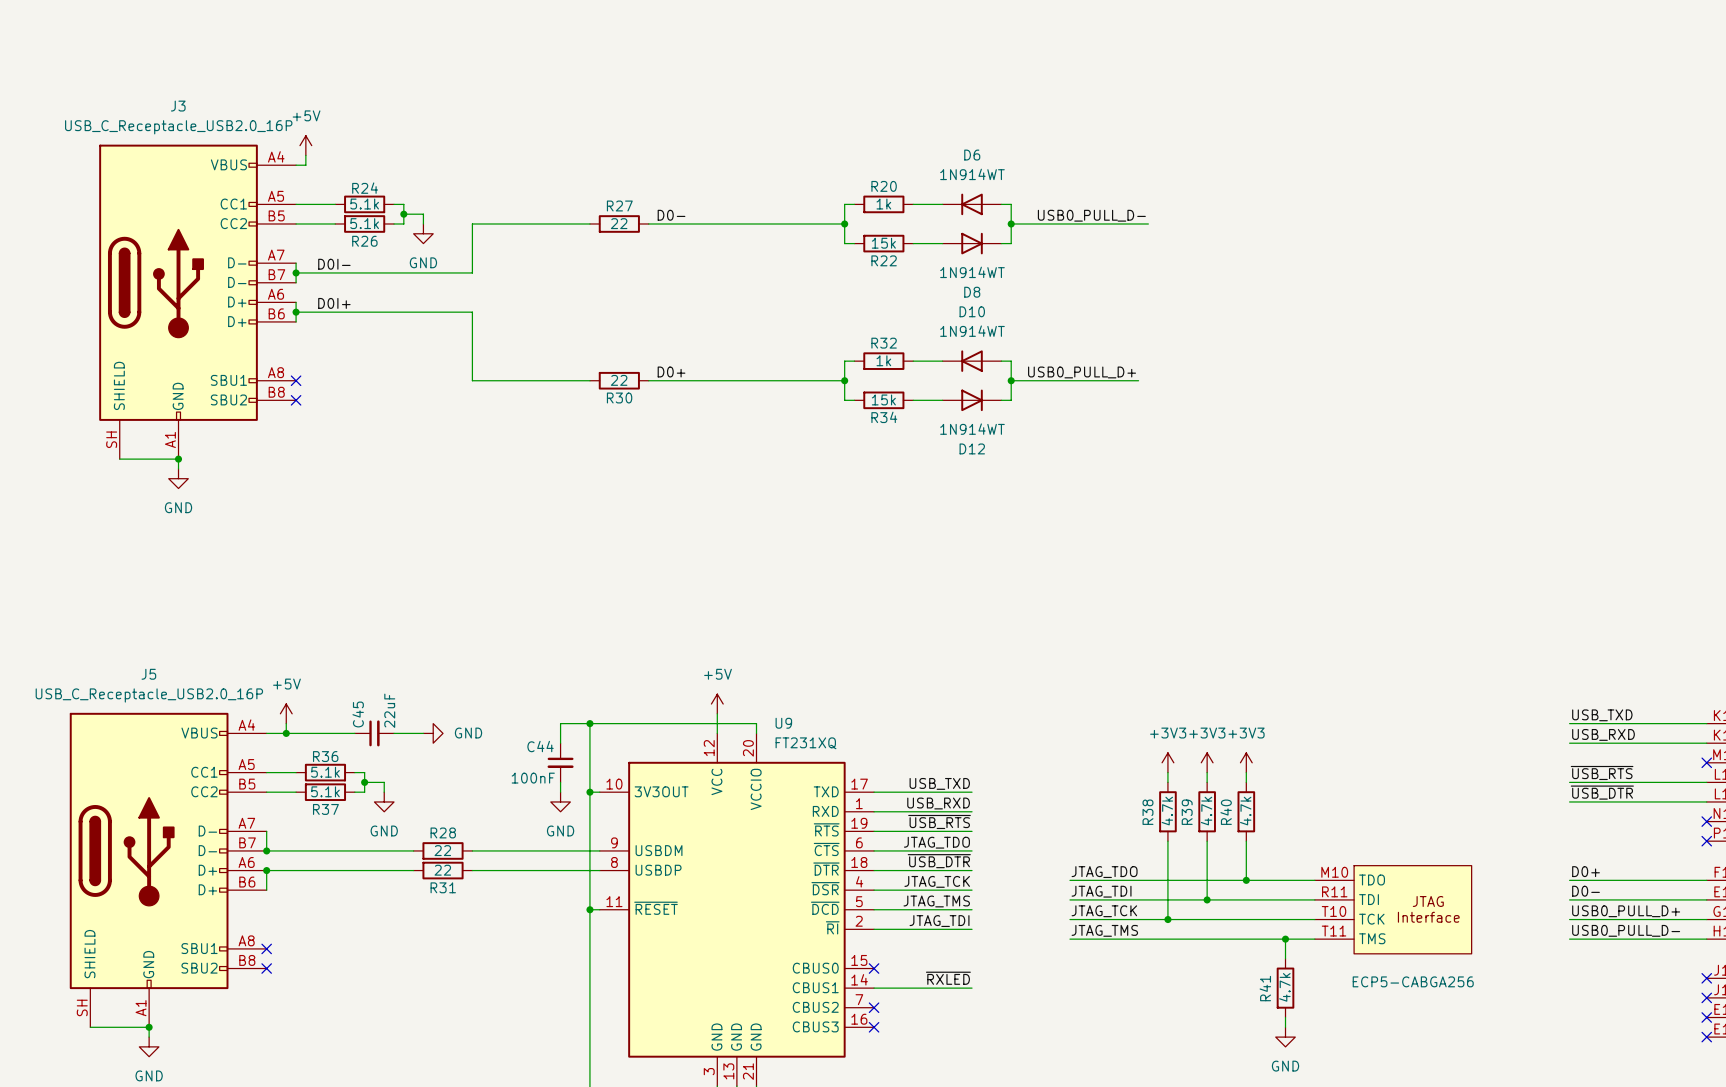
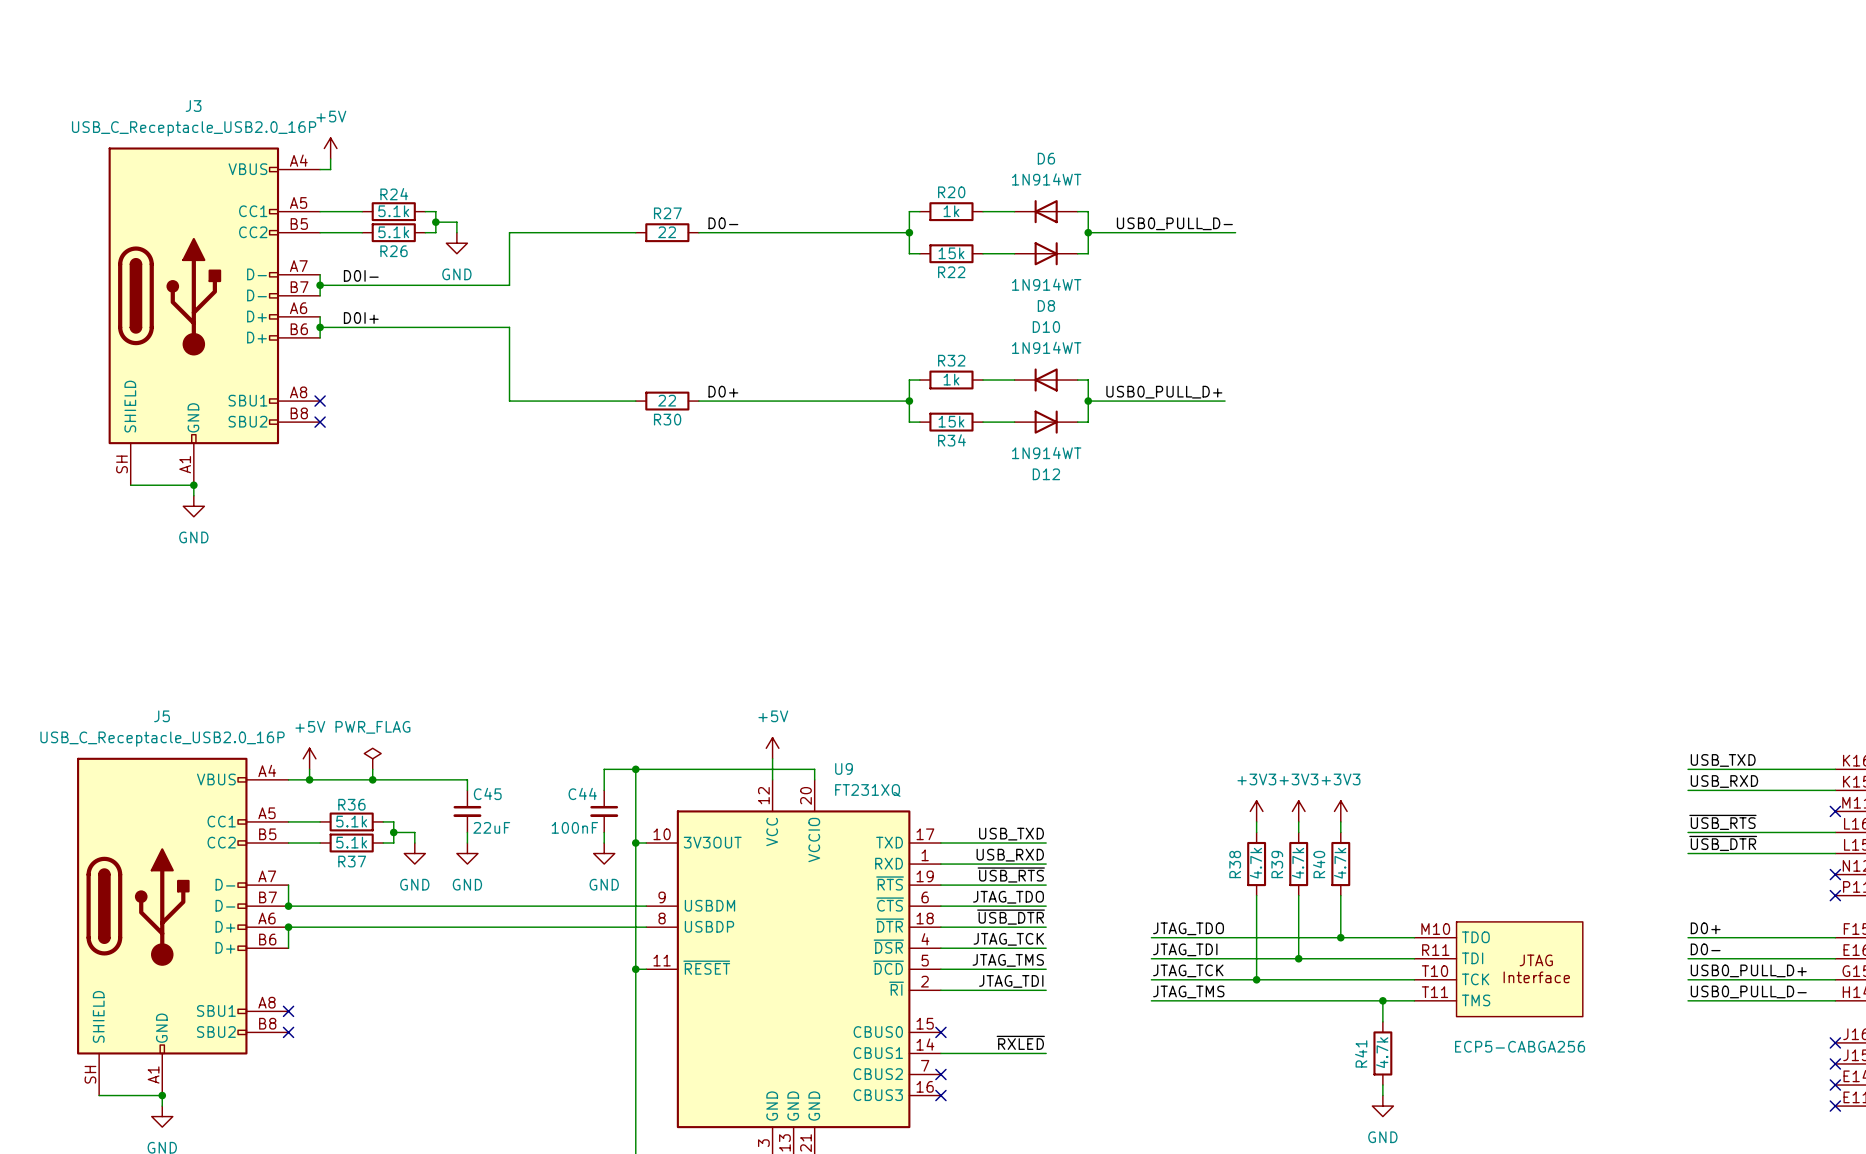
power symbol: none -> PWR_FLAG (372, 758)
wire: none -> (372, 769) (372, 779)
junction: none -> (372, 779)
C45 rotation: 0° (374, 733) -> 90° clockwise (467, 811)
C45 position: (374, 733) -> (467, 811)
power symbol rotation: 0° (433, 733) -> 90° clockwise (467, 853)
power symbol position: GND (433, 733) -> GND (467, 853)
wire: none -> (467, 832) (467, 843)
wire: none -> (446, 906) (509, 906)
R28: 22 (443, 850) -> none
wire: none -> (446, 927) (509, 927)
R31: 22 (443, 870) -> none

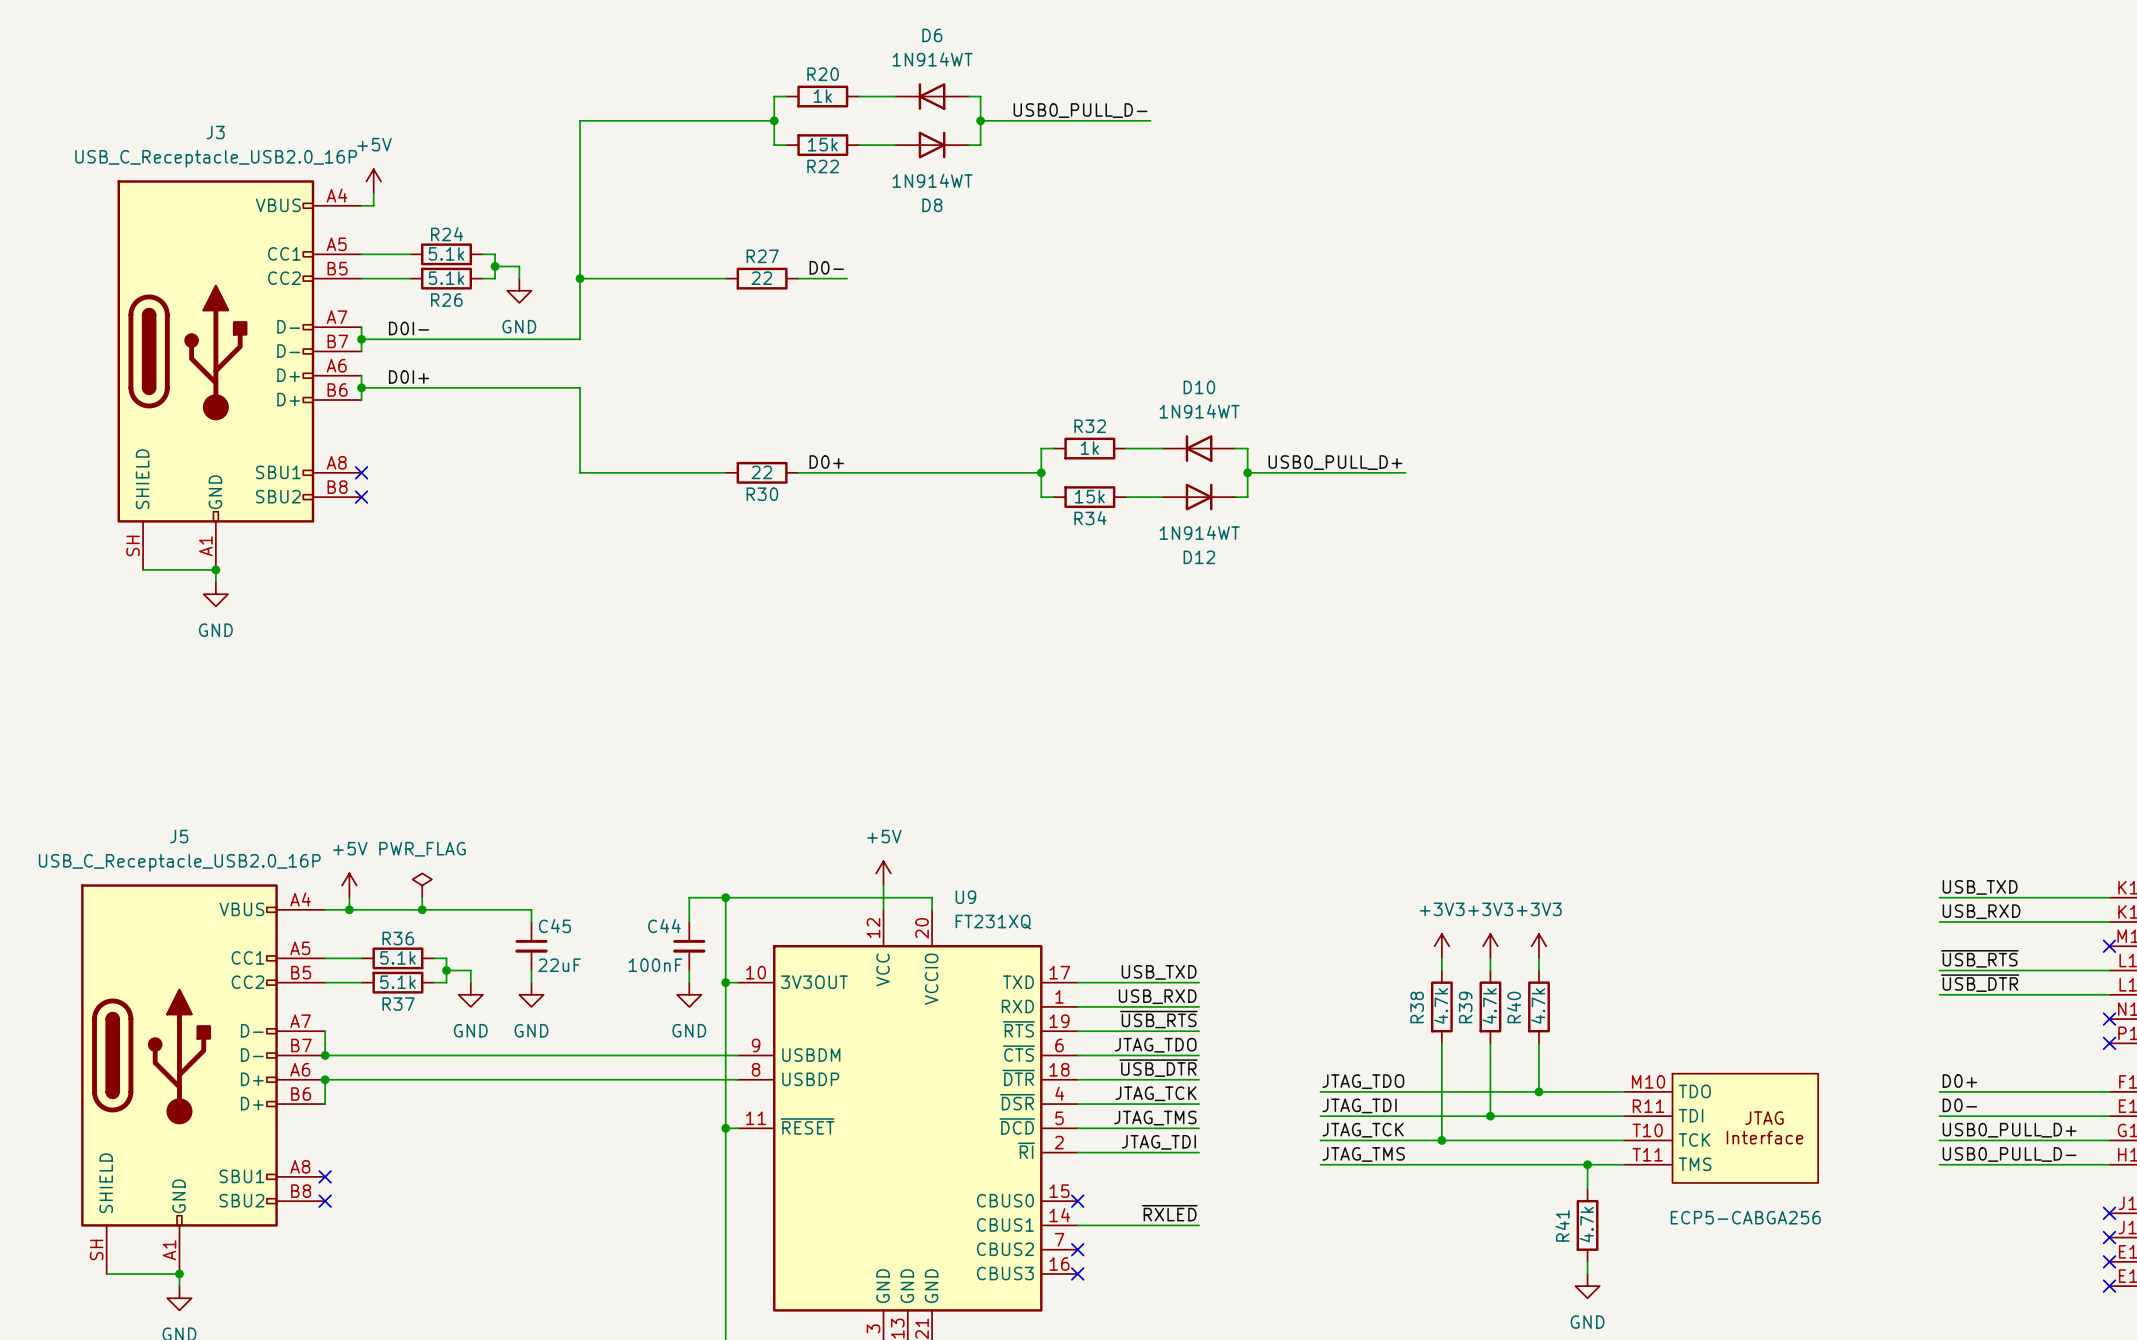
wire: none -> (786, 96) (774, 96) (774, 145) (786, 145)
wire: none -> (859, 96) (895, 96)
wire: none -> (968, 96) (980, 96) (980, 145) (968, 145)
label: none -> USB0_PULL_D- (1080, 110)
wire: none -> (774, 120) (580, 120) (580, 278)
junction: none -> (774, 120)
wire: none -> (980, 120) (1150, 120)
junction: none -> (980, 120)
wire: none -> (859, 145) (895, 145)
wire: (919, 211) (909, 211) (909, 253) (919, 253) -> none
R20 position: (951, 211) -> (822, 96)
wire: (983, 211) (1014, 211) -> none
D6 position: (1046, 211) -> (932, 96)
wire: (1077, 211) (1088, 211) (1088, 253) (1077, 253) -> none
label: USB0_PULL_D- (1174, 223) -> none
junction: none -> (580, 278)
wire: (741, 232) (909, 232) -> none
junction: (909, 232) -> none
wire: (1088, 232) (1235, 232) -> none
junction: (1088, 232) -> none
R22 position: (951, 253) -> (822, 145)
wire: (983, 253) (1014, 253) -> none
D8 position: (1046, 253) -> (932, 145)

